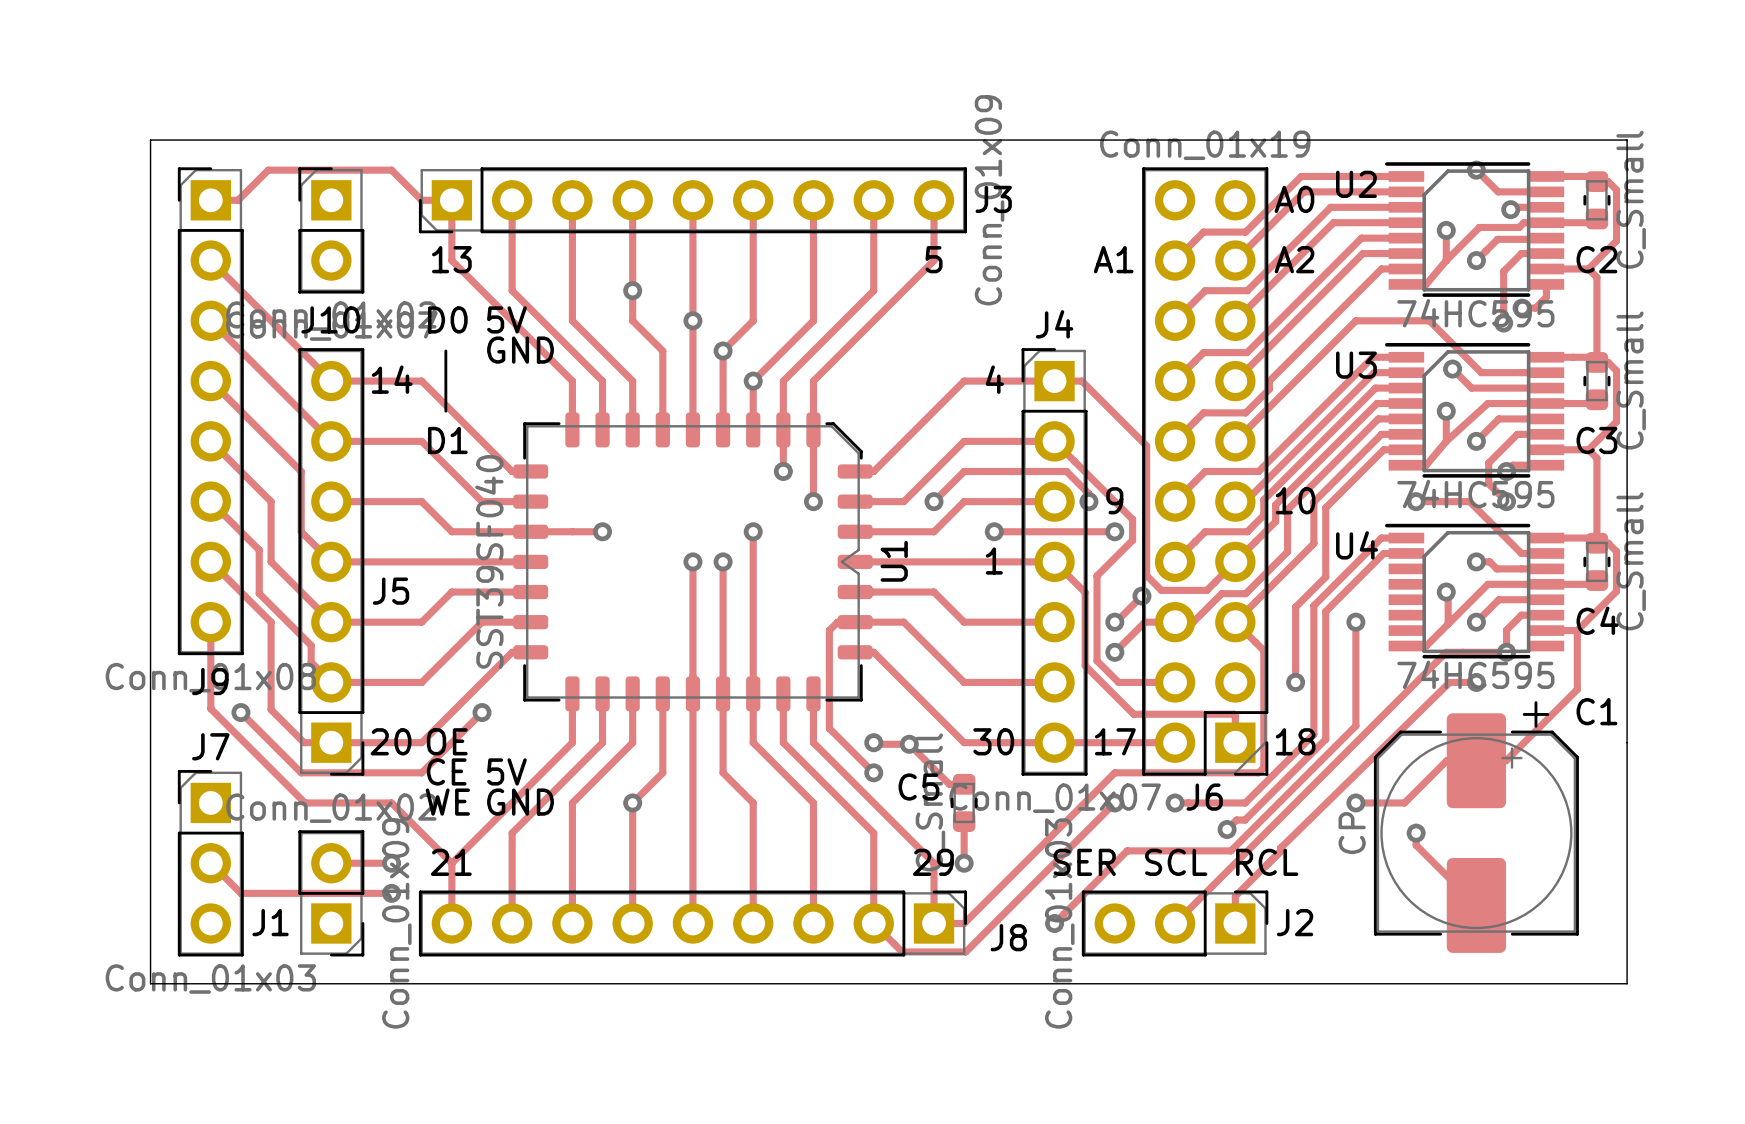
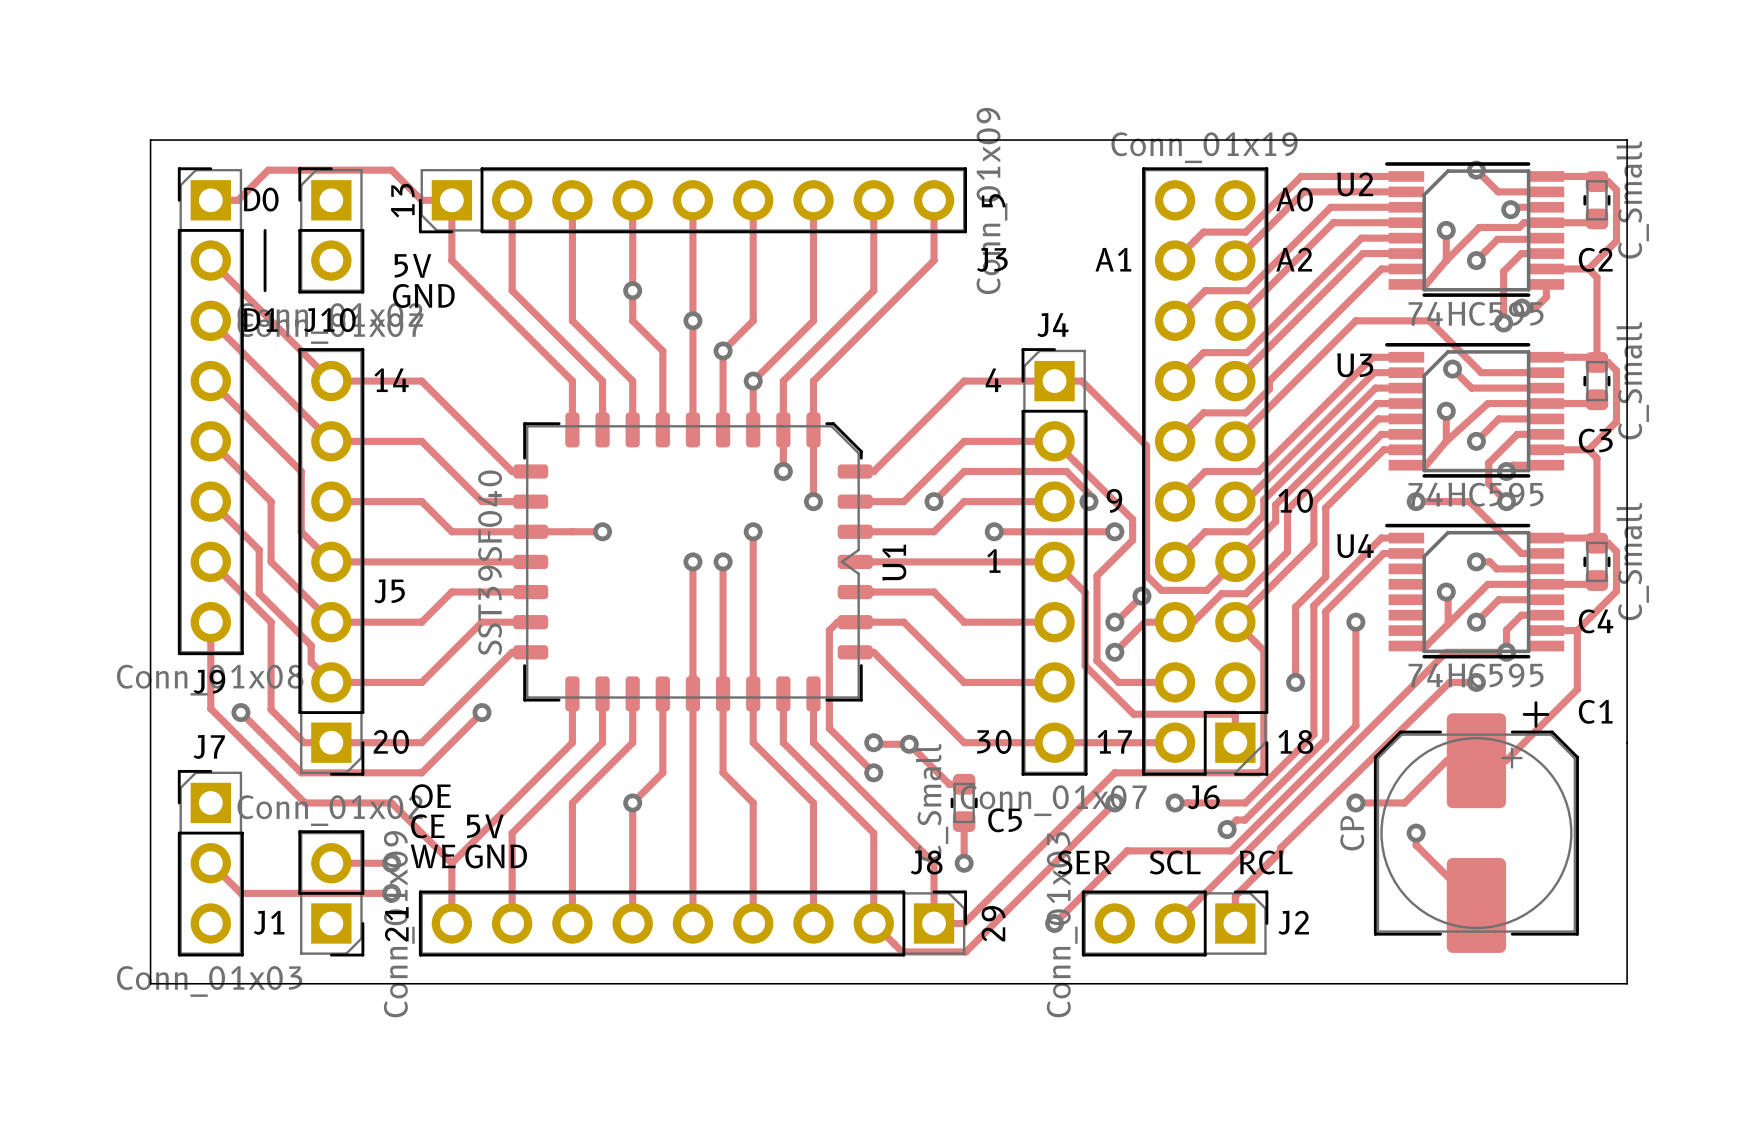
J3 name position: J3 (993, 199) -> J3 (992, 259)
text rotation: 0° (451, 259) -> 90° counterclockwise (402, 200)
text position: 13 (451, 259) -> 13 (402, 200)
text rotation: 0° (934, 259) -> 90° counterclockwise (993, 200)
text position: 5 (934, 259) -> 5 (993, 200)
text position: D0 (447, 319) -> D0 (261, 199)
text position: 5V (506, 319) -> 5V (413, 265)
line: (445, 350) (445, 411) -> (265, 230) (265, 290)
text position: GND (520, 350) -> GND (423, 295)
text position: D1 (447, 440) -> D1 (260, 319)
text position: OE (447, 741) -> OE (431, 796)
text position: CE (446, 771) -> CE (427, 826)
text position: 5V (506, 771) -> 5V (485, 826)
C5 name position: C5 (918, 787) -> C5 (1005, 820)
text position: WE (447, 802) -> WE (433, 856)
text position: GND (520, 802) -> GND (496, 856)
text rotation: 0° (451, 862) -> 90° counterclockwise (396, 924)
text position: 21 (451, 862) -> 21 (396, 924)
text rotation: 0° (933, 862) -> 90° counterclockwise (993, 923)
text position: 29 (933, 862) -> 29 (993, 923)
J8 name position: J8 (1008, 937) -> J8 (926, 862)

